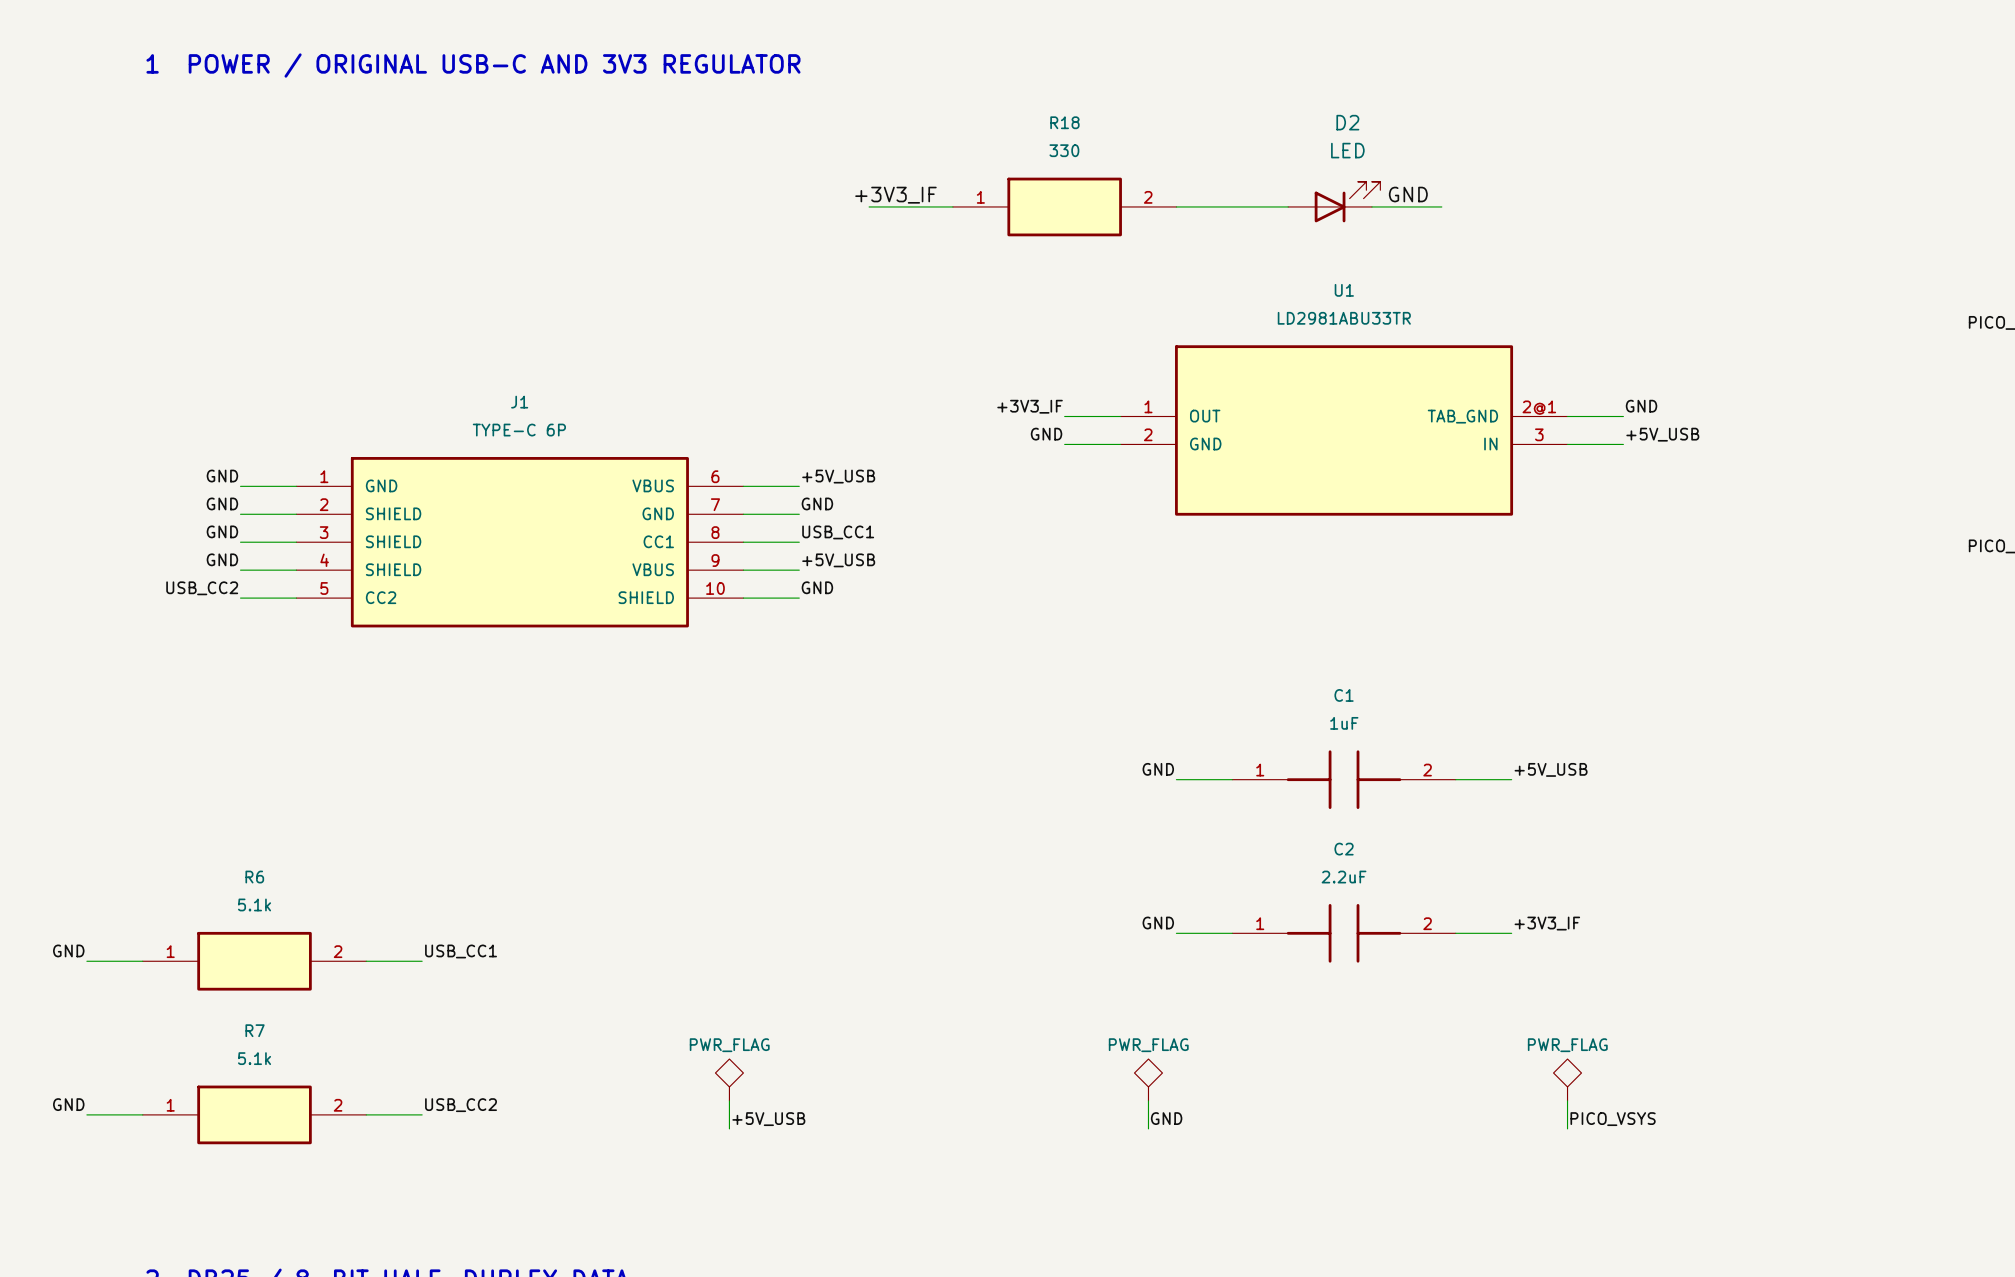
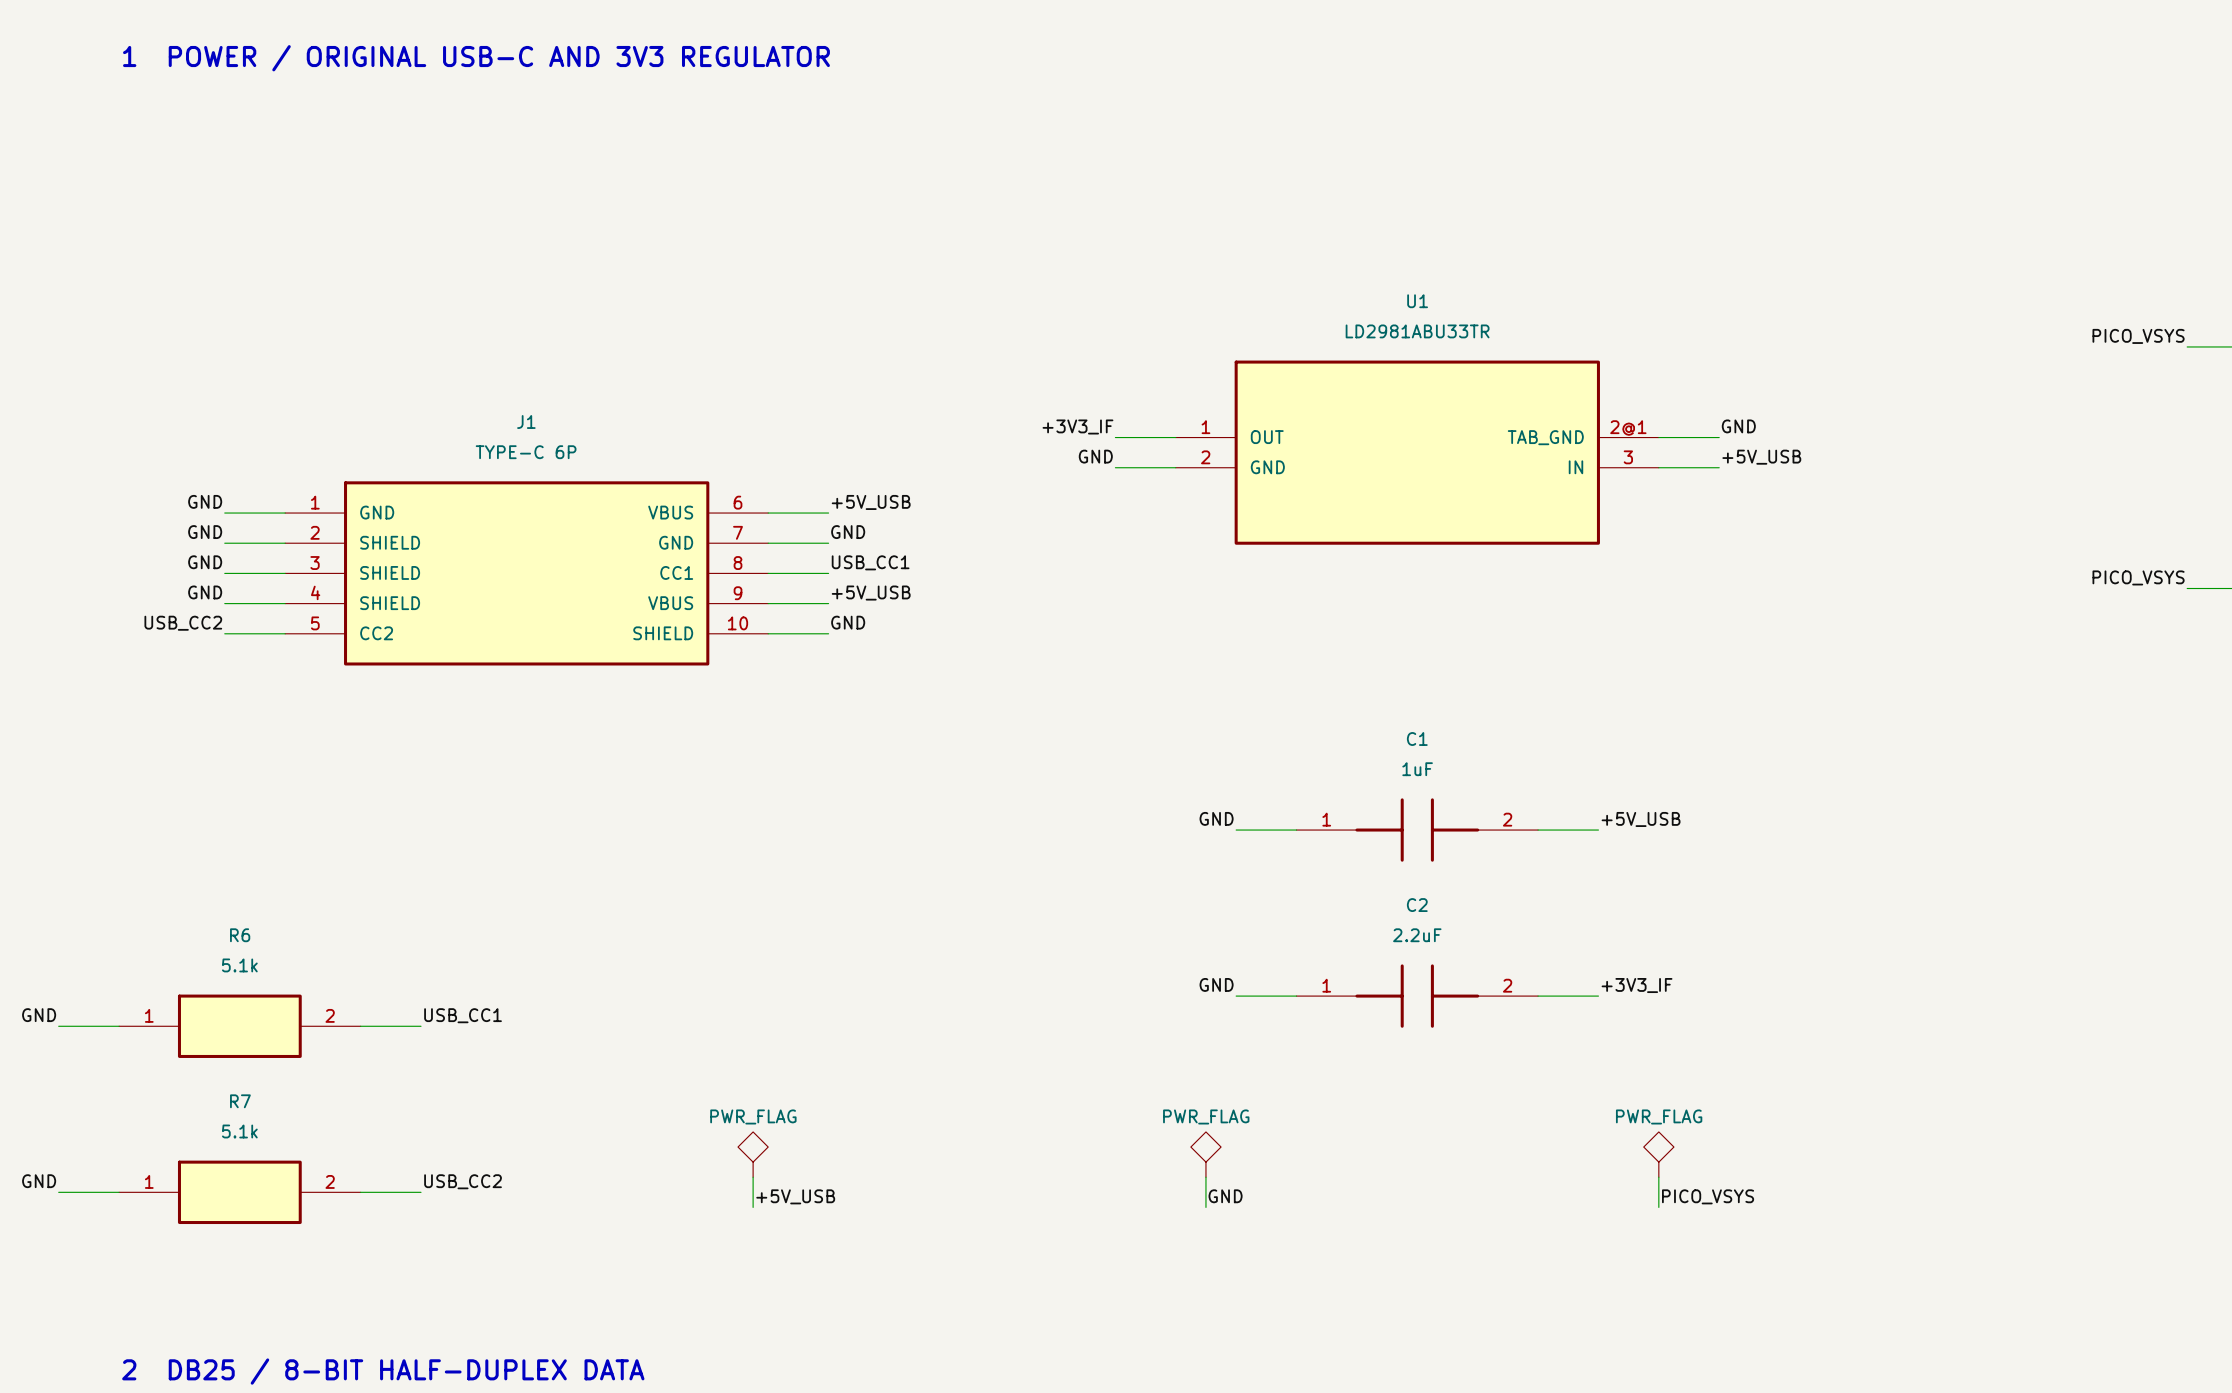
label: GND (1408, 194) -> none
label: +3V3_IF (895, 195) -> none
D2: LED (1334, 202) -> none
wire: (869, 206) (952, 206) -> none
R18: 330 (1064, 206) -> none
wire: (1176, 206) (1288, 206) -> none
wire: (1371, 206) (1441, 206) -> none

